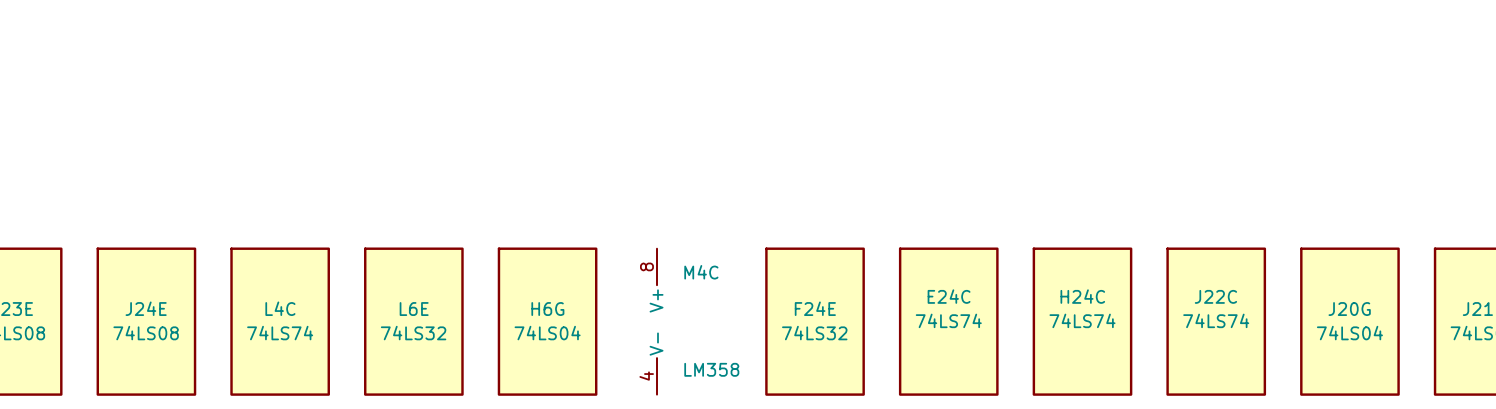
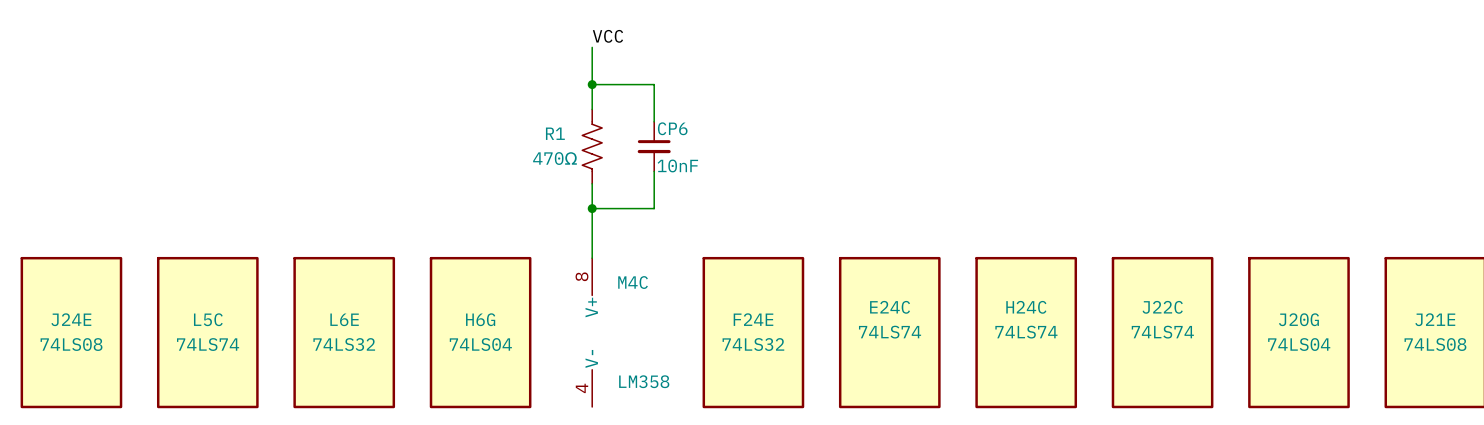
label: none -> VCC (607, 36)
wire: none -> (592, 47) (592, 109)
wire: none -> (592, 84) (654, 84) (654, 121)
junction: none -> (592, 84)
R1: none -> 470Ω (592, 146)
CP6: none -> 10nF (654, 146)
wire: none -> (654, 171) (654, 208) (592, 208)
wire: none -> (592, 183) (592, 258)
junction: none -> (592, 208)
L4C name: L4C (280, 308) -> L5C (208, 319)

